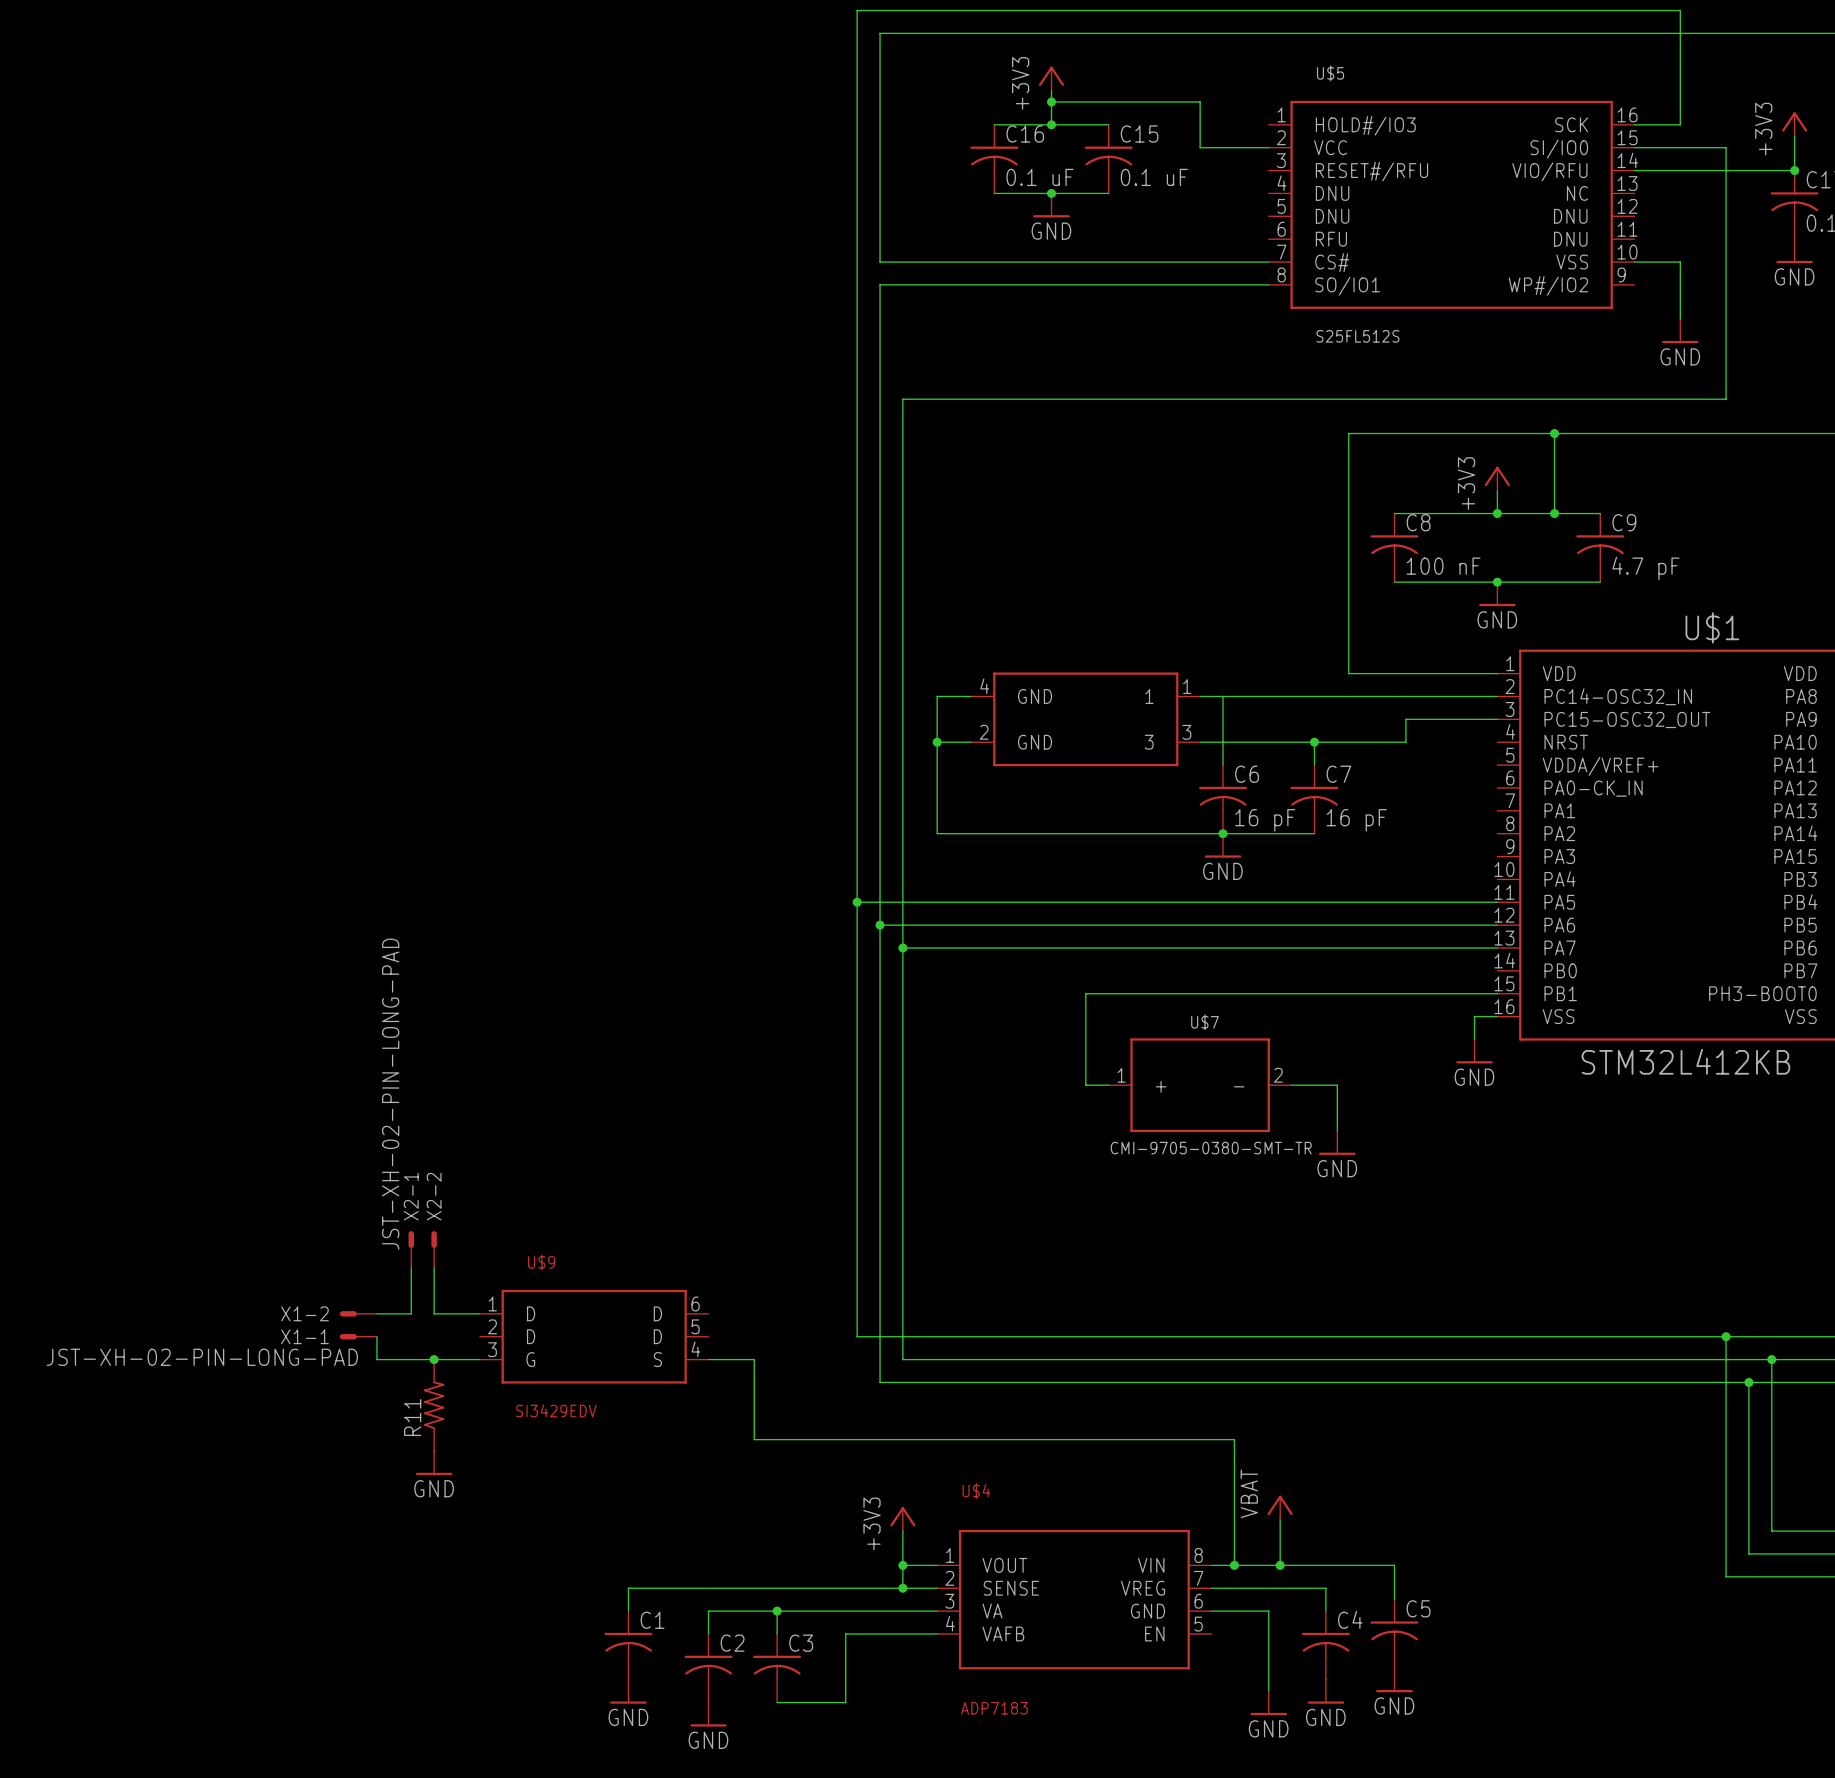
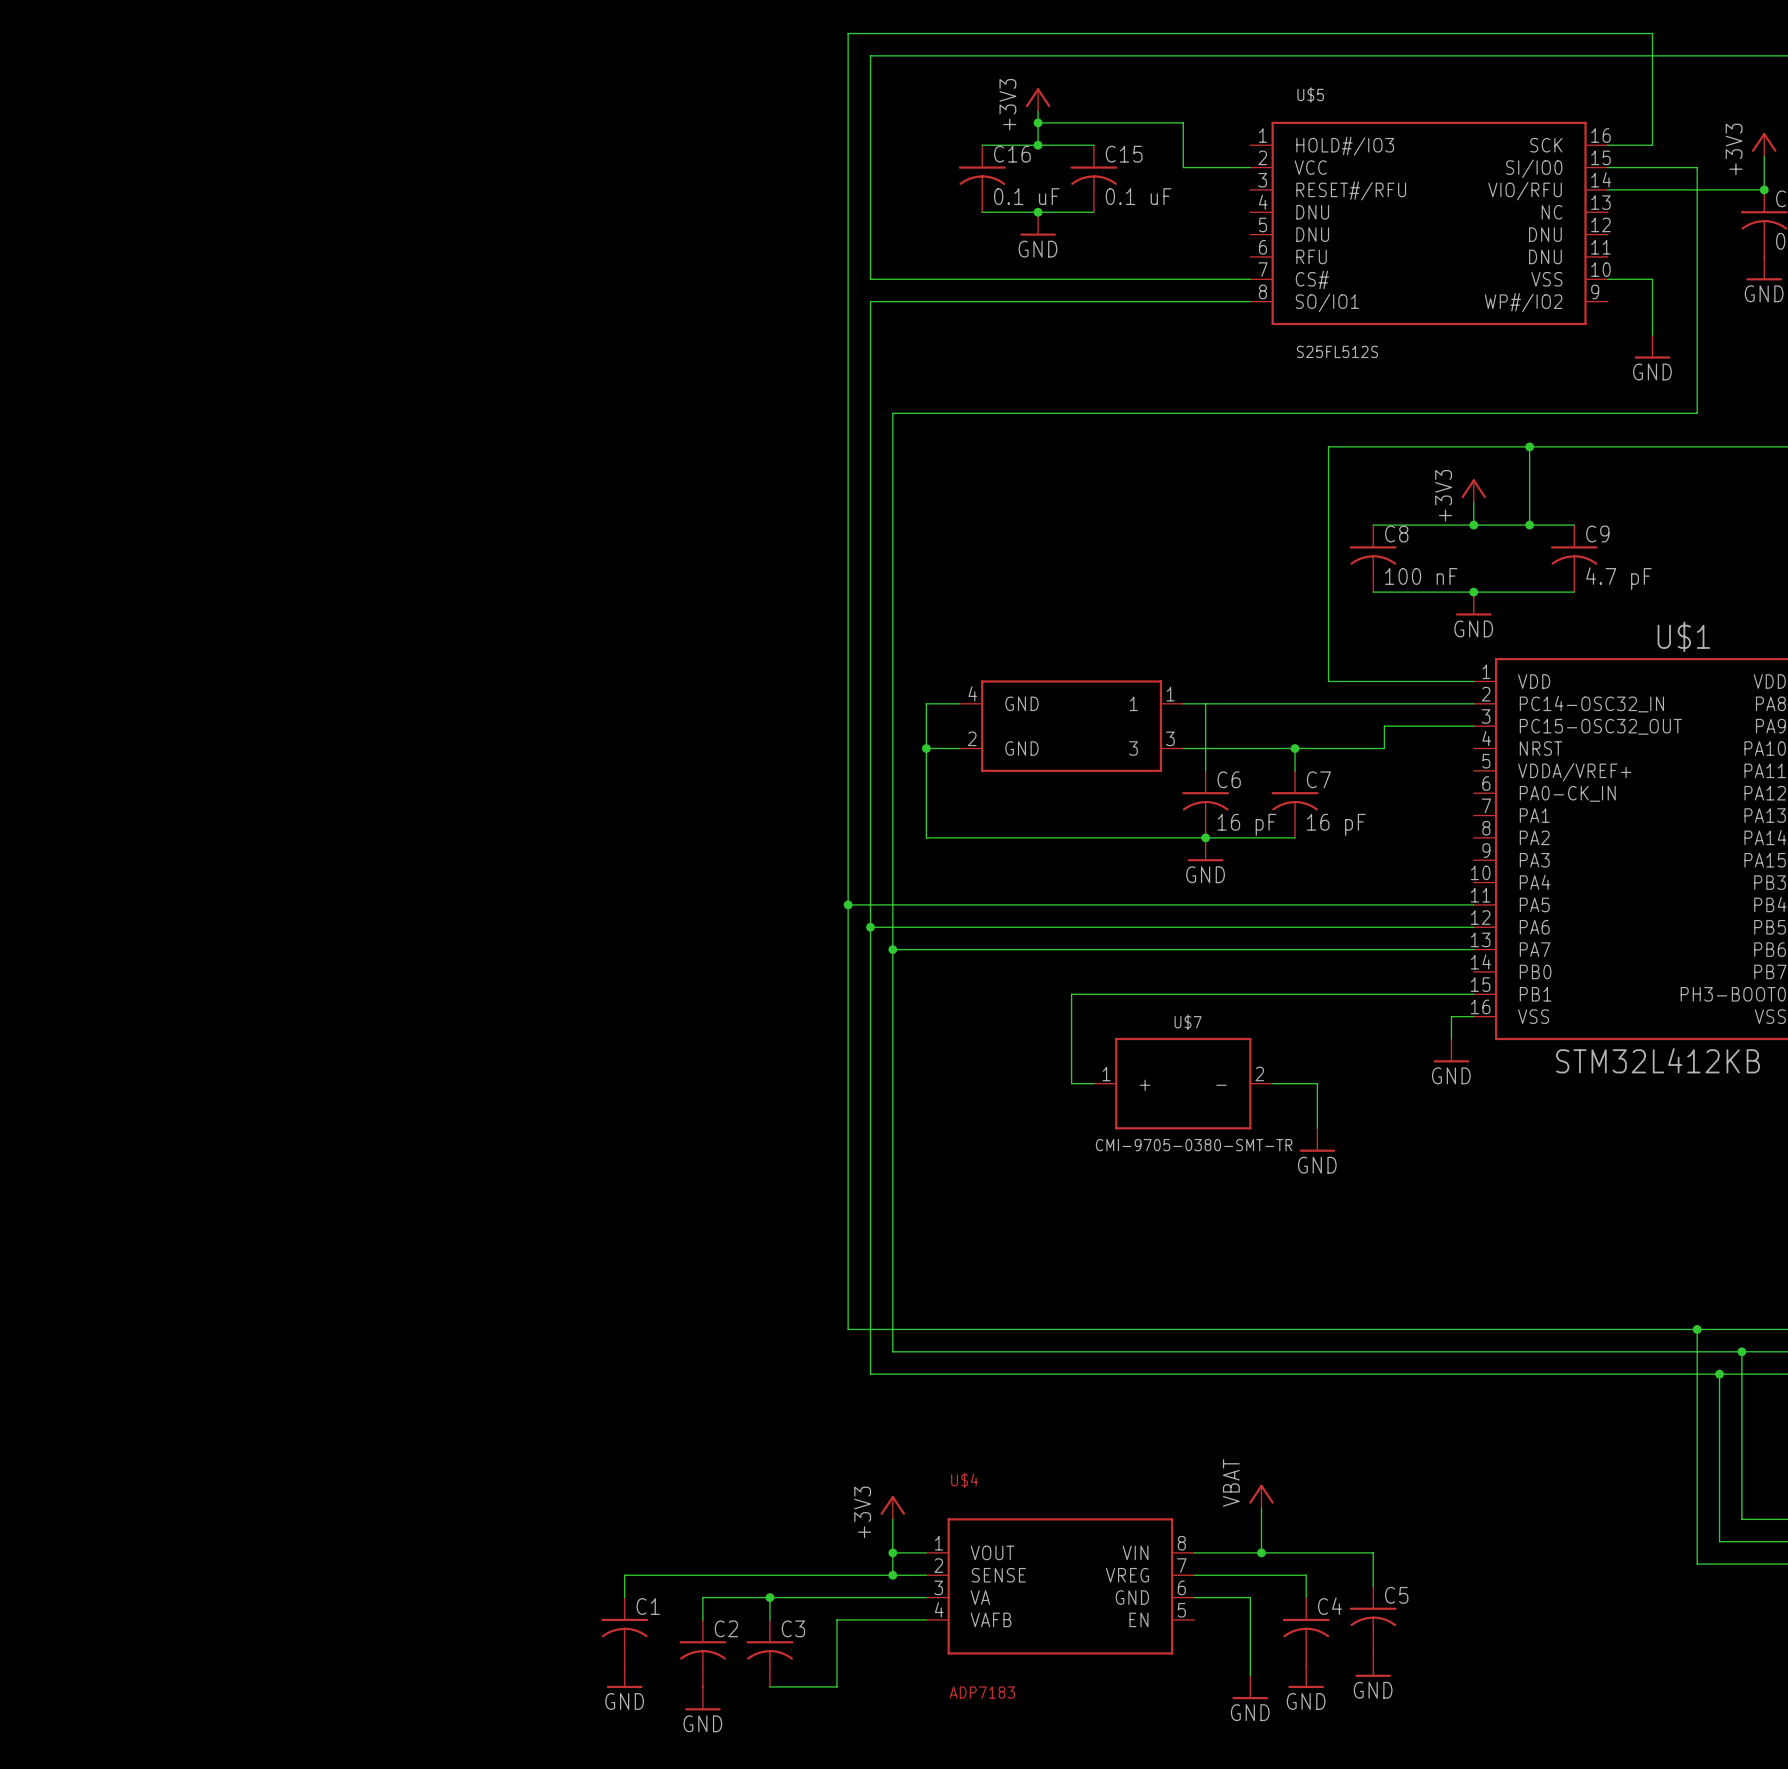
X2-1: JST-XH-02-PIN-LONG-PAD (411, 1249) -> none
X2-2: (434, 1249) -> none
wire: (411, 1268) (411, 1313) (376, 1313) -> none
wire: (434, 1268) (434, 1313) (479, 1313) -> none
X1-2: (358, 1313) -> none
X1-1: JST-XH-02-PIN-LONG-PAD (358, 1336) -> none
wire: (376, 1336) (376, 1359) (479, 1359) -> none
U$9: SI3429EDV (594, 1336) -> none
junction: (434, 1359) -> none
wire: (708, 1359) (754, 1359) (754, 1439) (1234, 1439) (1234, 1565) -> none
R11: (434, 1405) -> none
power symbol: GND (434, 1463) -> none
junction: (1234, 1565) -> none

